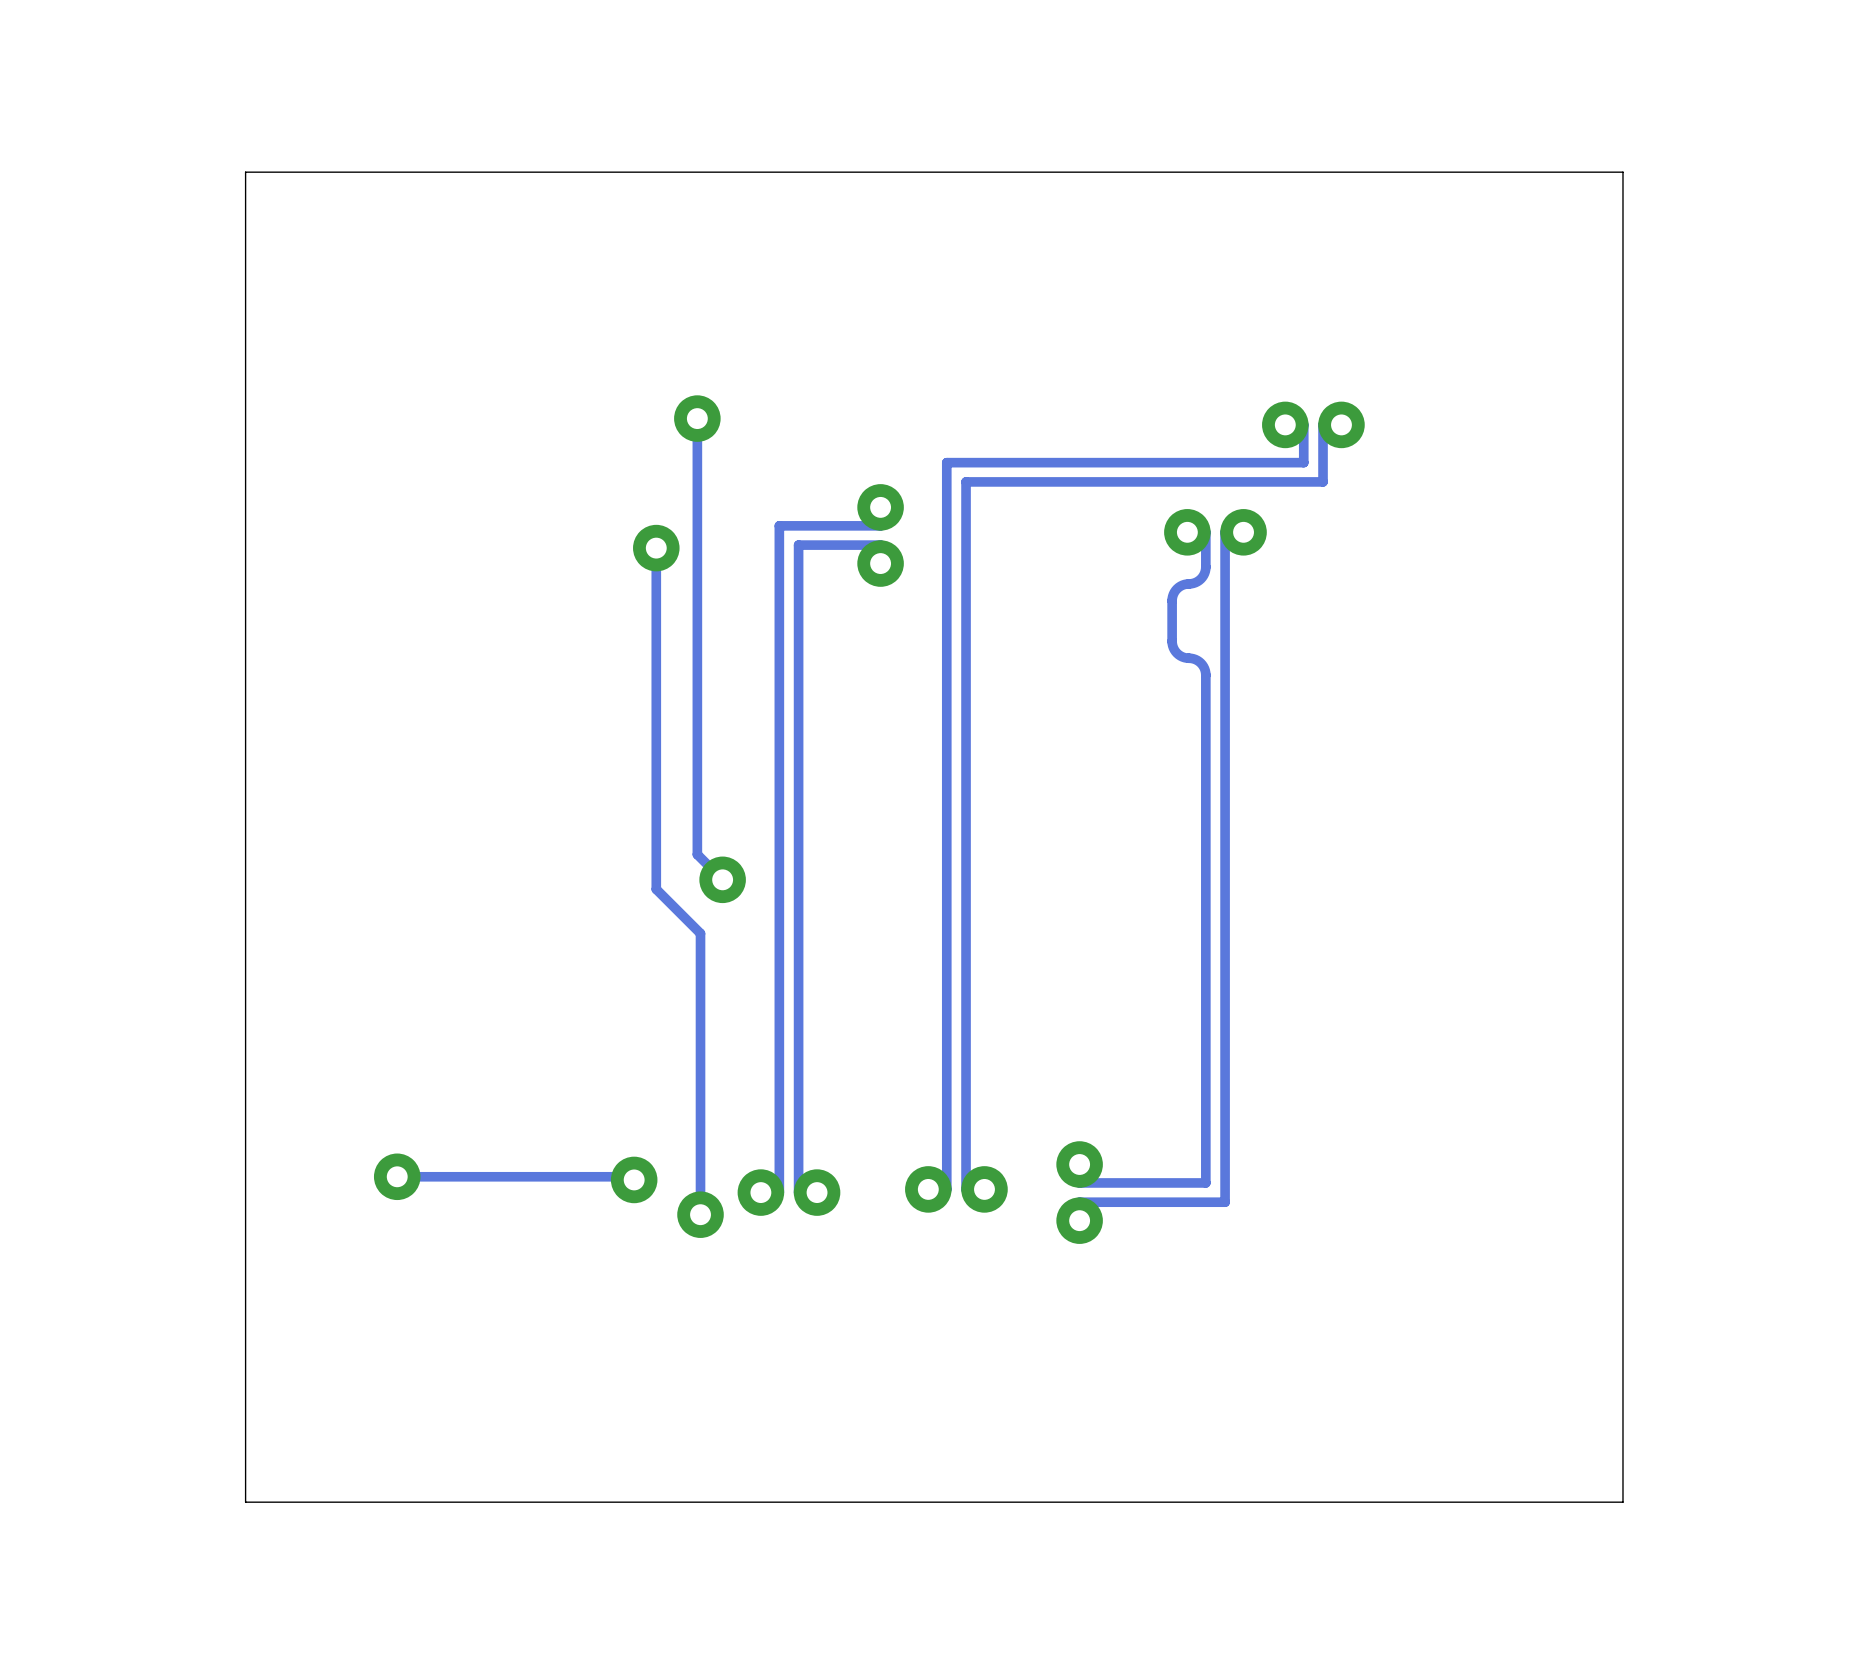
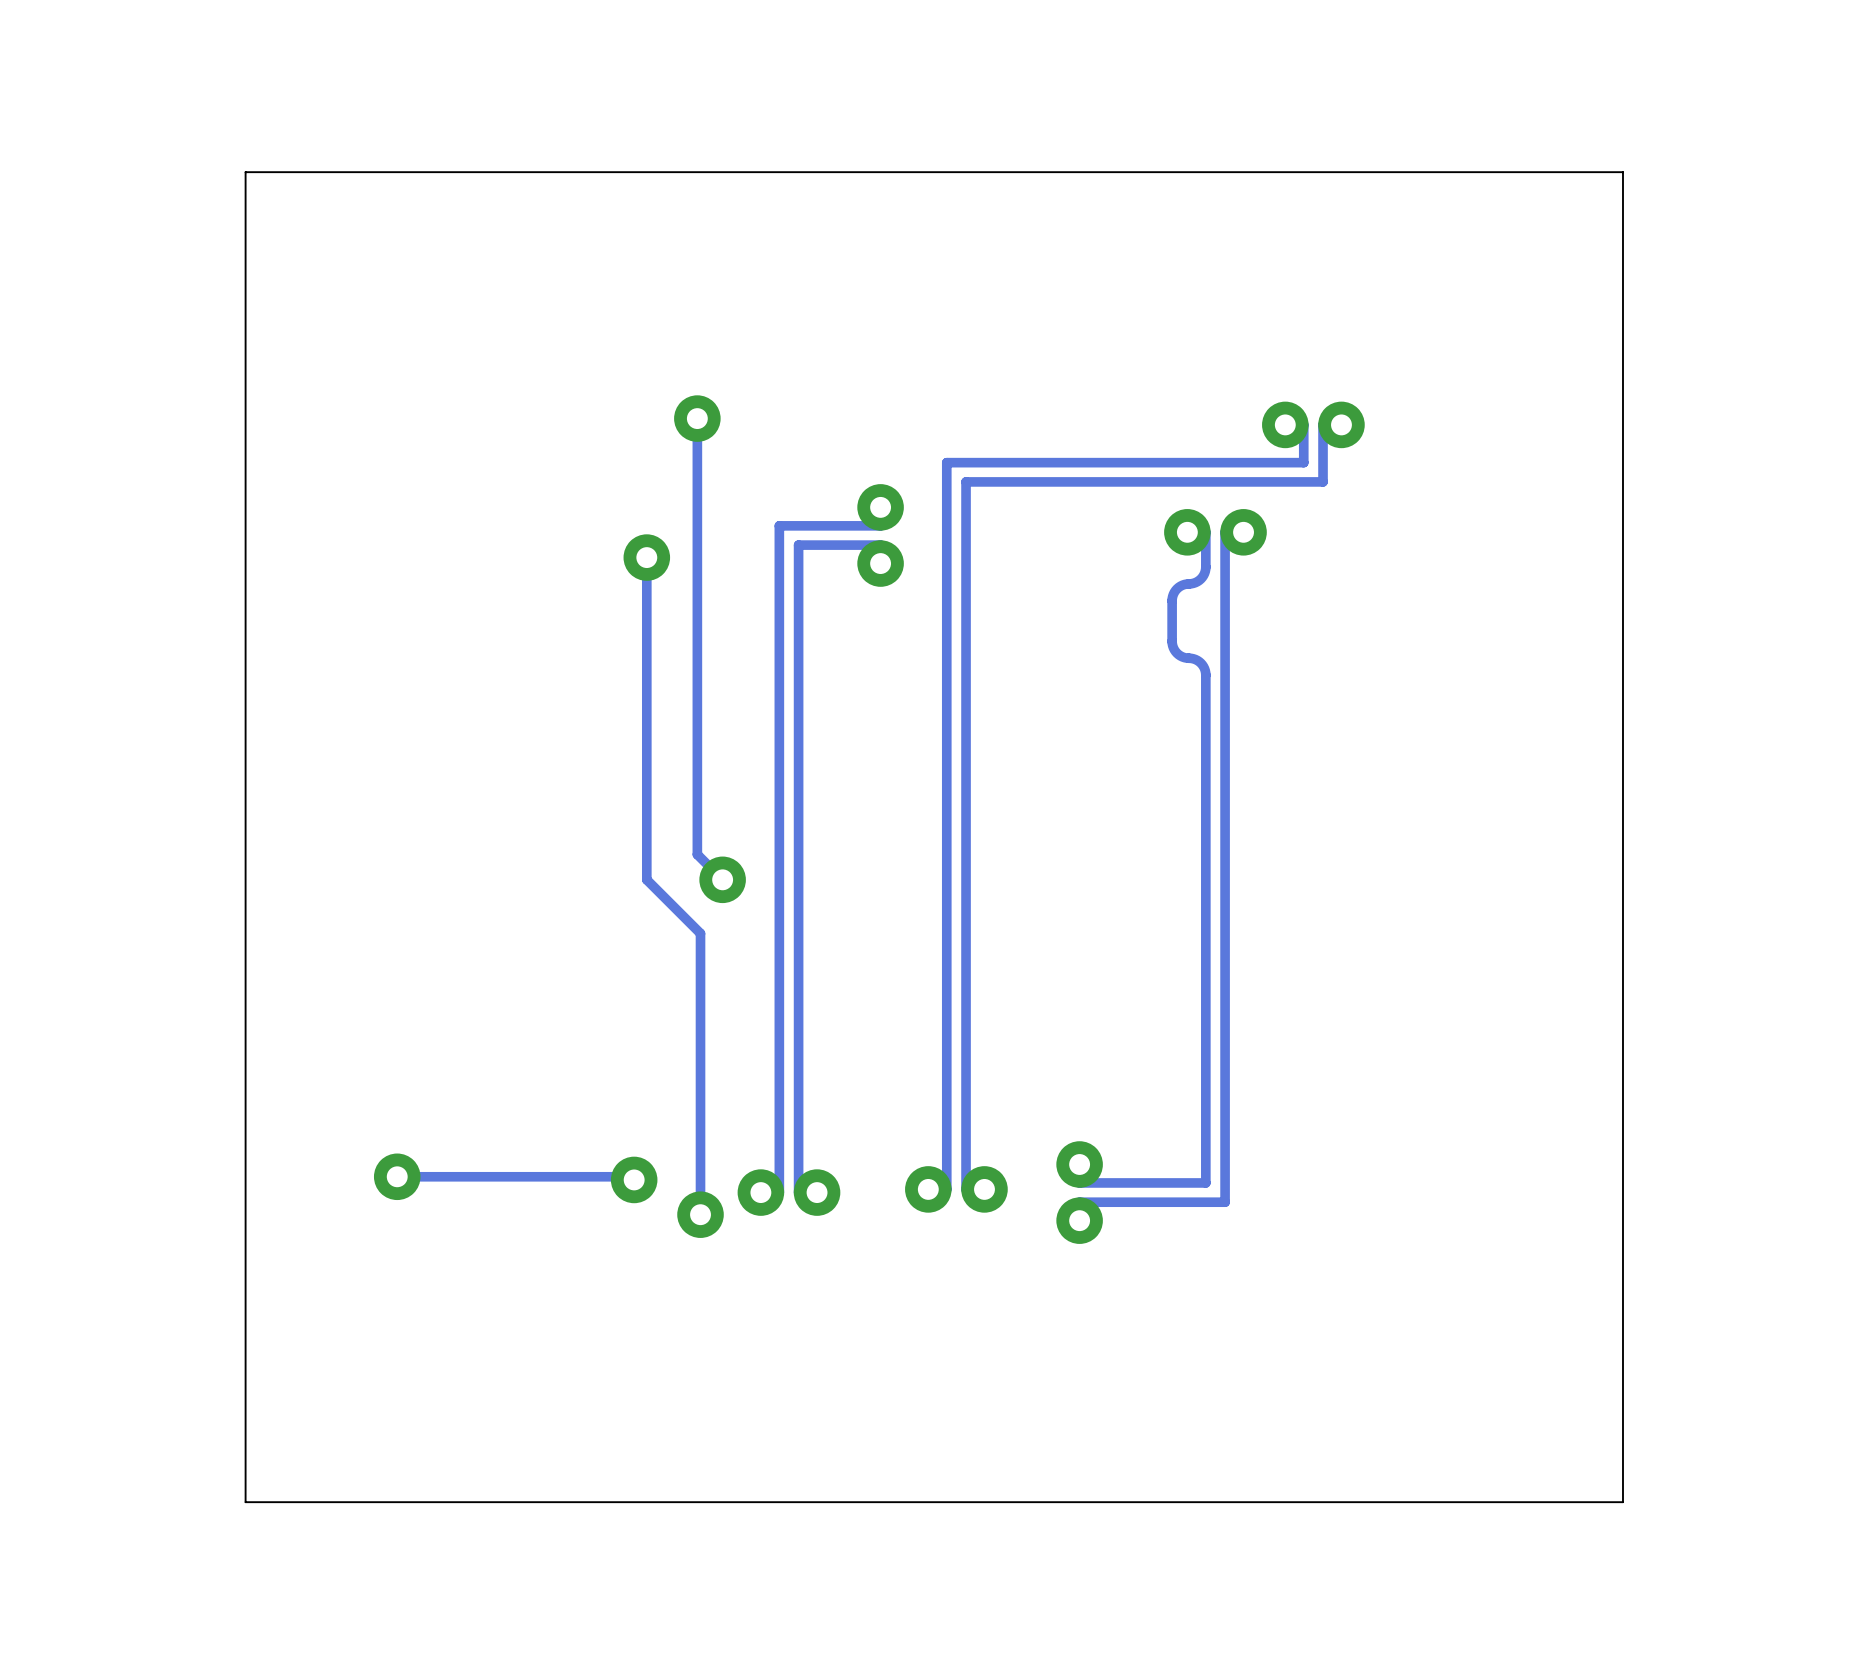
track: (656, 548) (656, 889) -> (646, 557) (646, 879) (656, 889)
via position: (656, 548) -> (646, 557)

